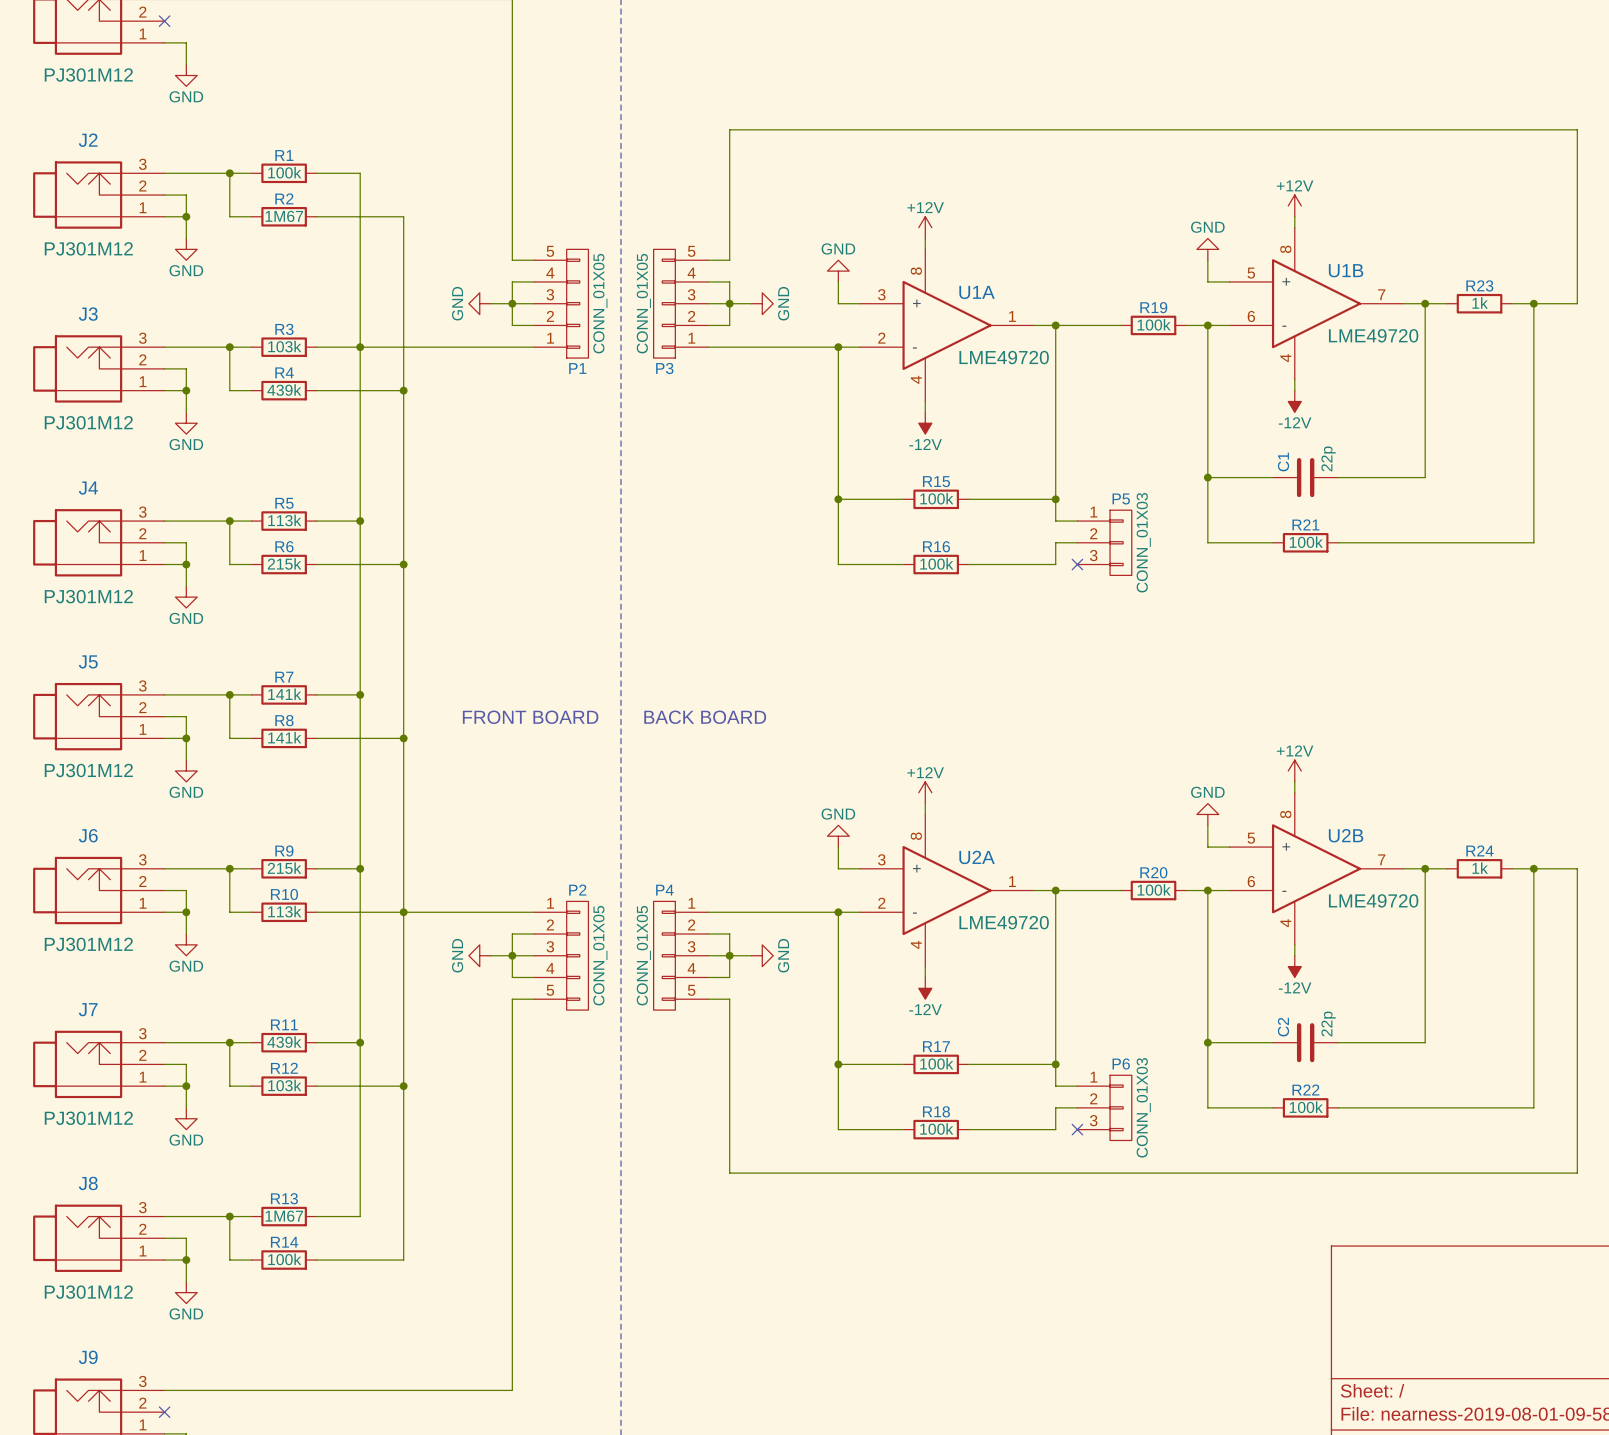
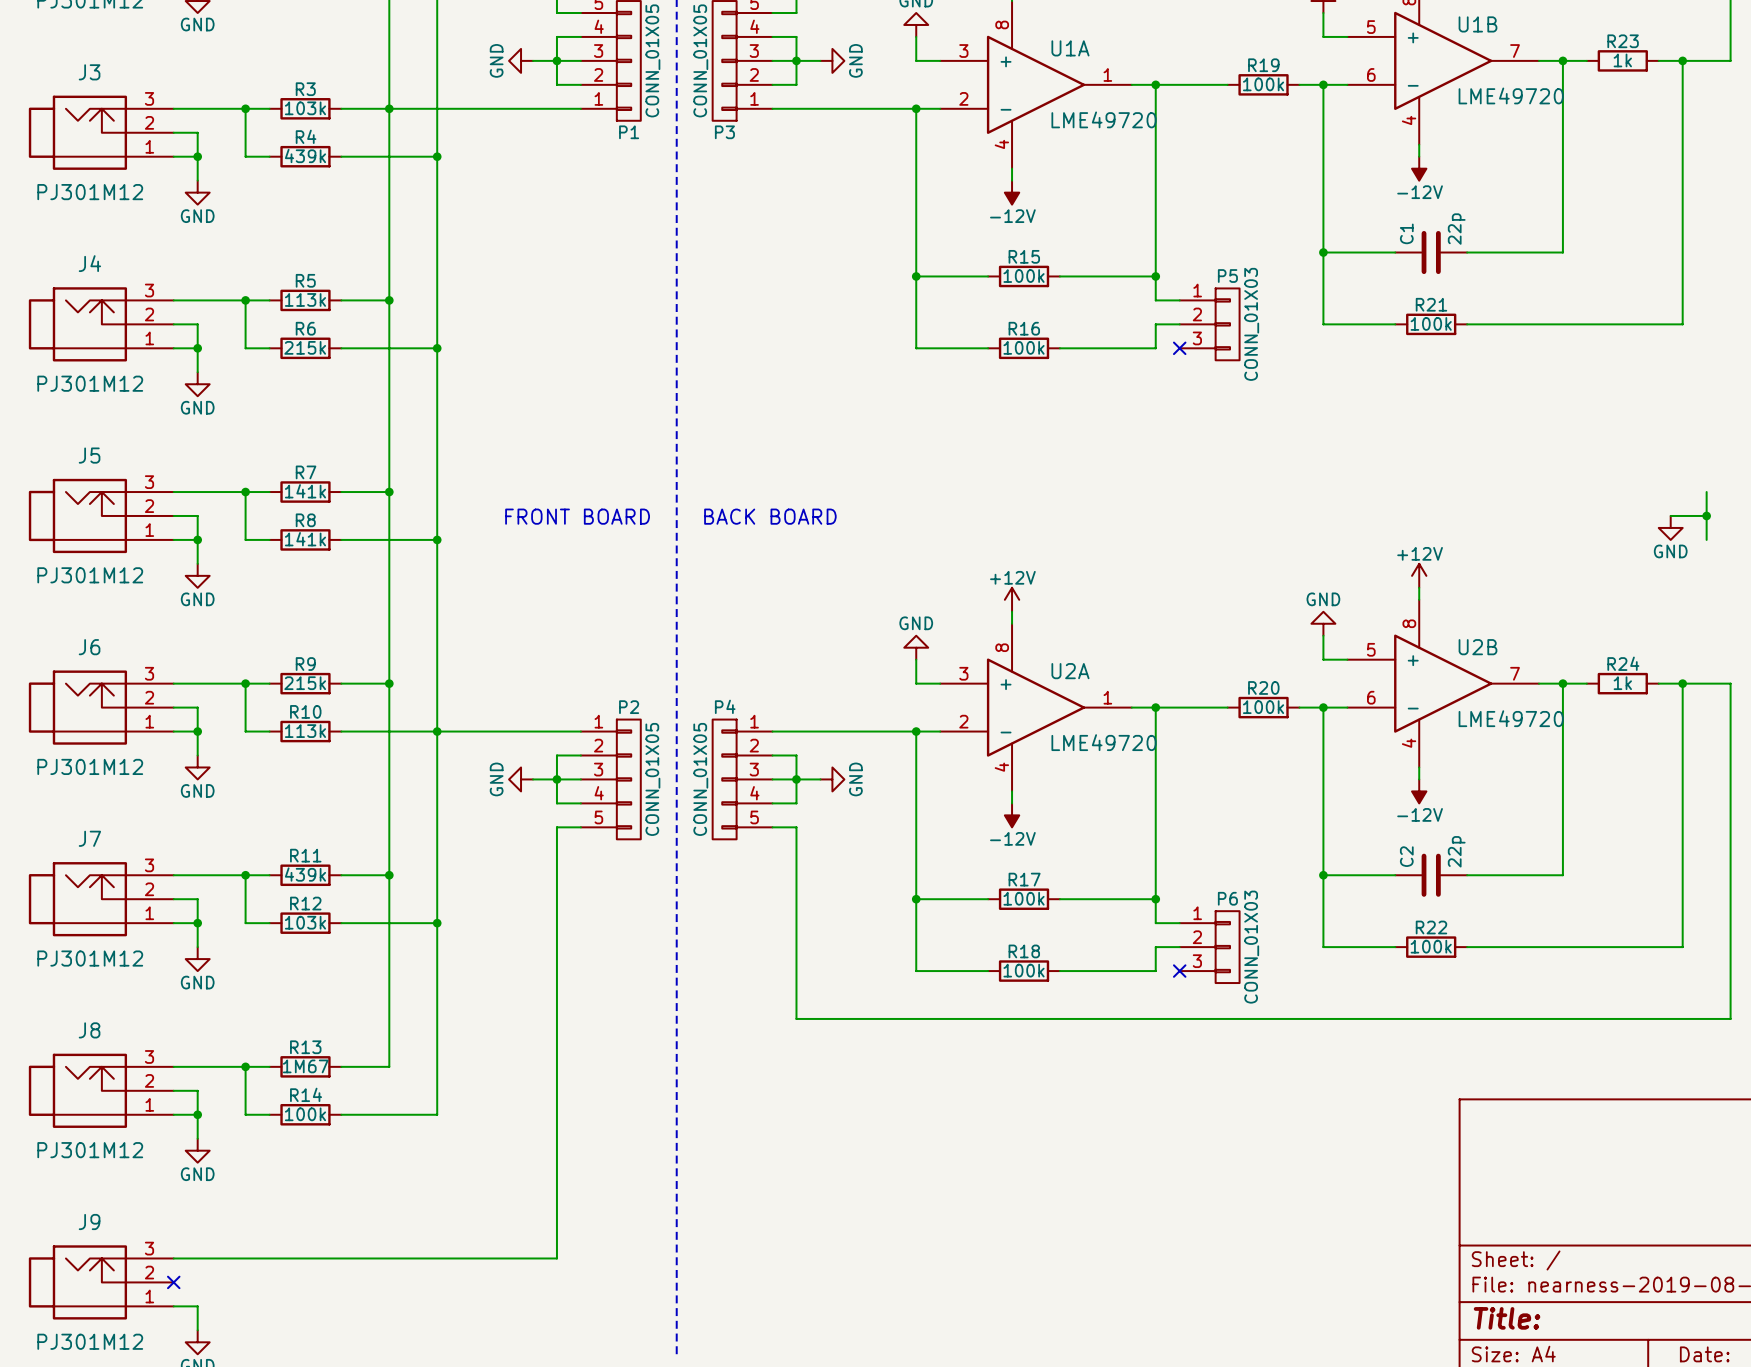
wire: none -> (1706, 492) (1706, 539)
wire: none -> (1670, 515) (1706, 515)
junction: none -> (1706, 515)
power symbol: none -> GND (1670, 527)

